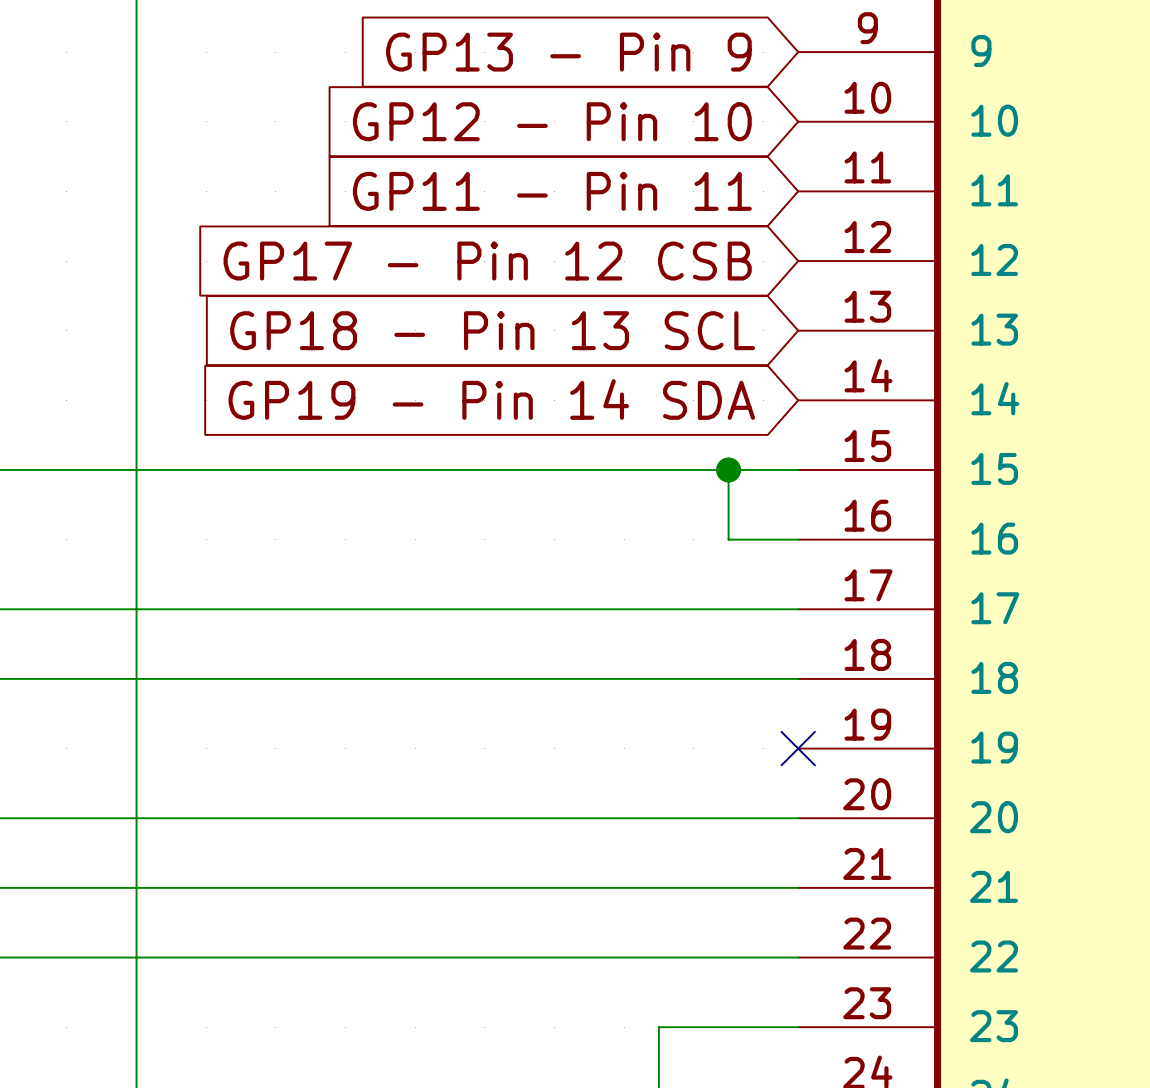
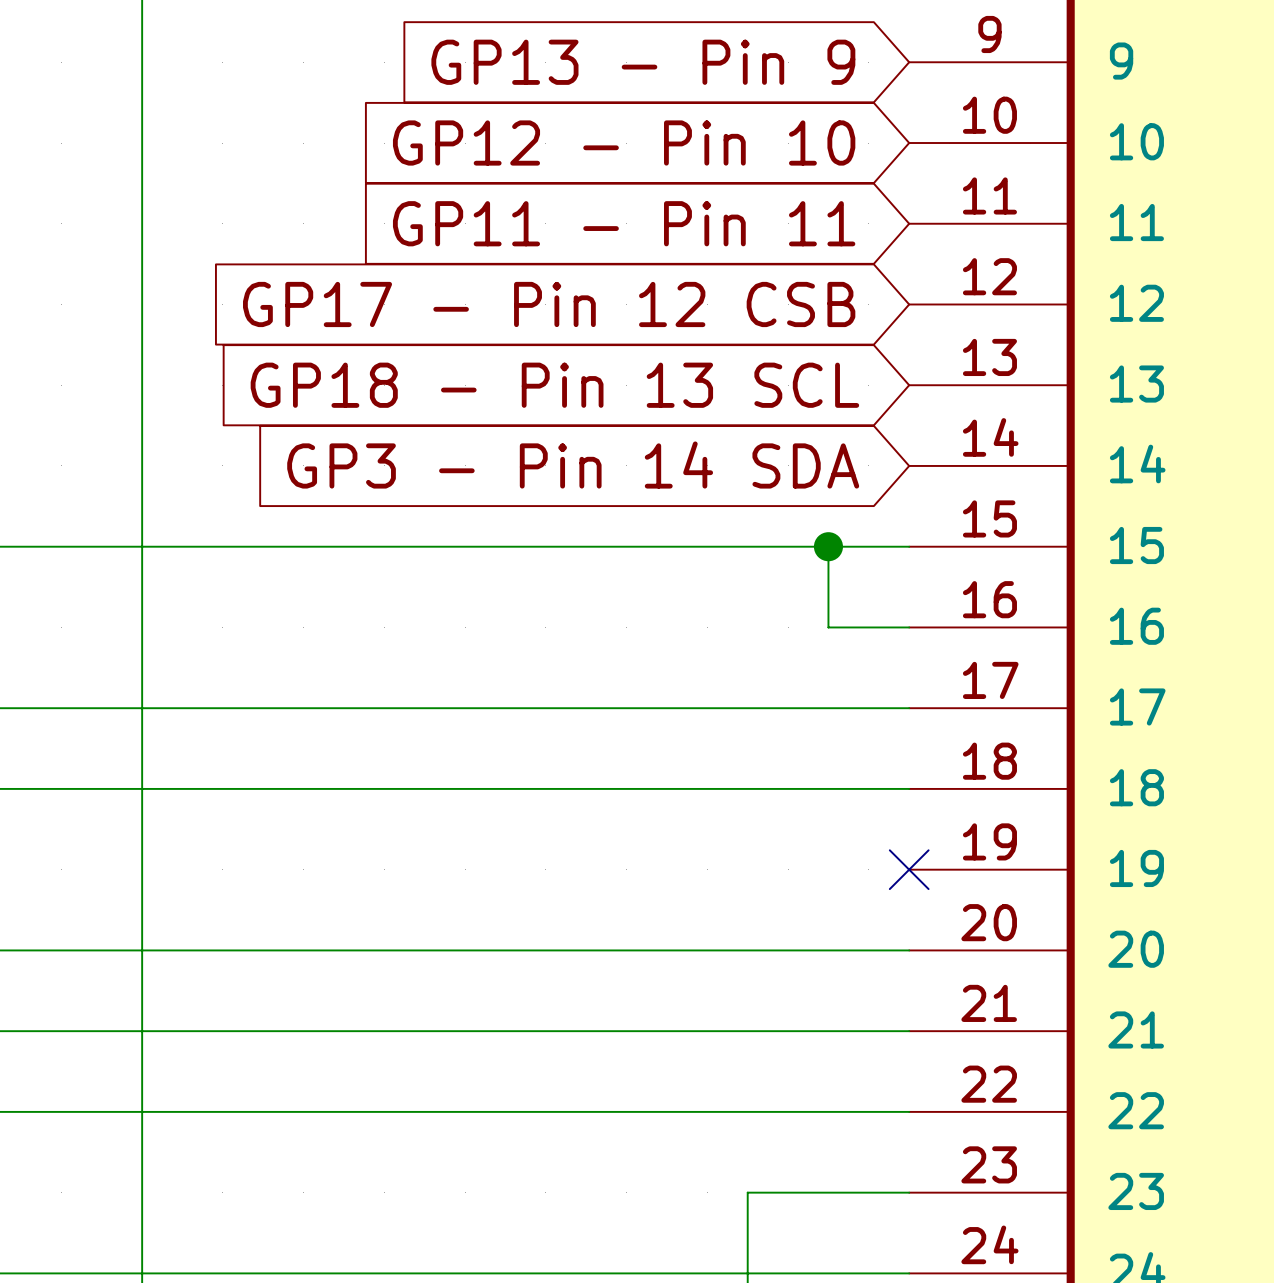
global label: GP19 - Pin 14 SDA (491, 399) -> GP3 - Pin 14 SDA (573, 465)

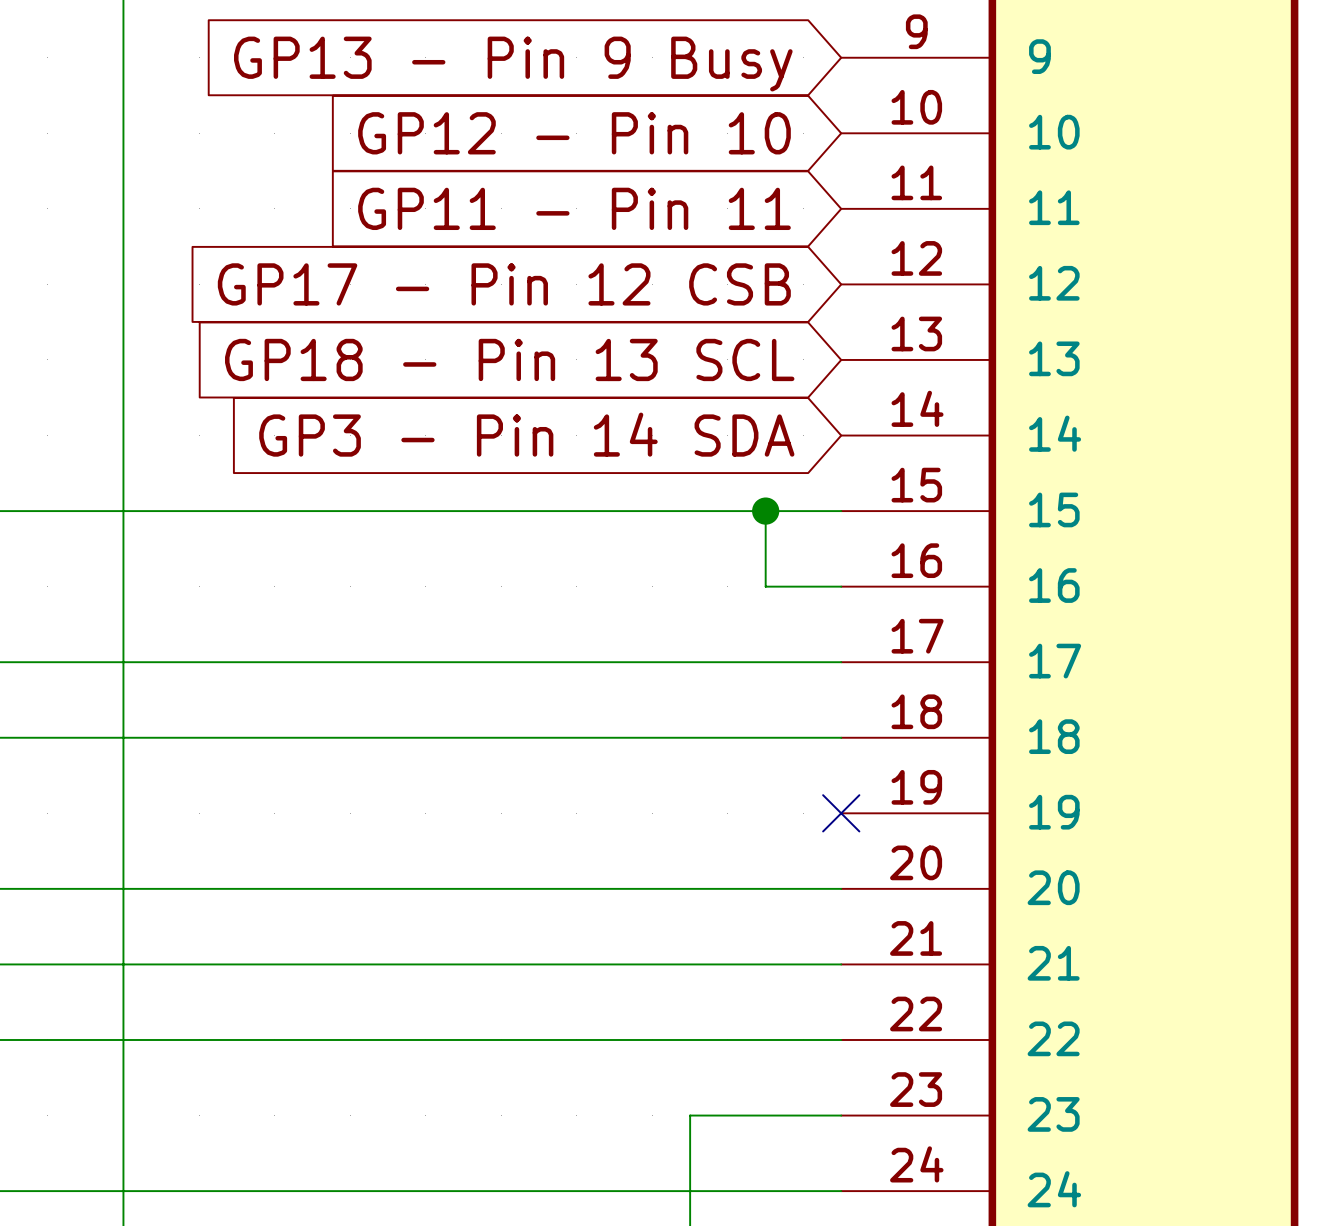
global label: GP13 - Pin 9 (643, 62) -> GP13 - Pin 9 Busy (513, 64)

